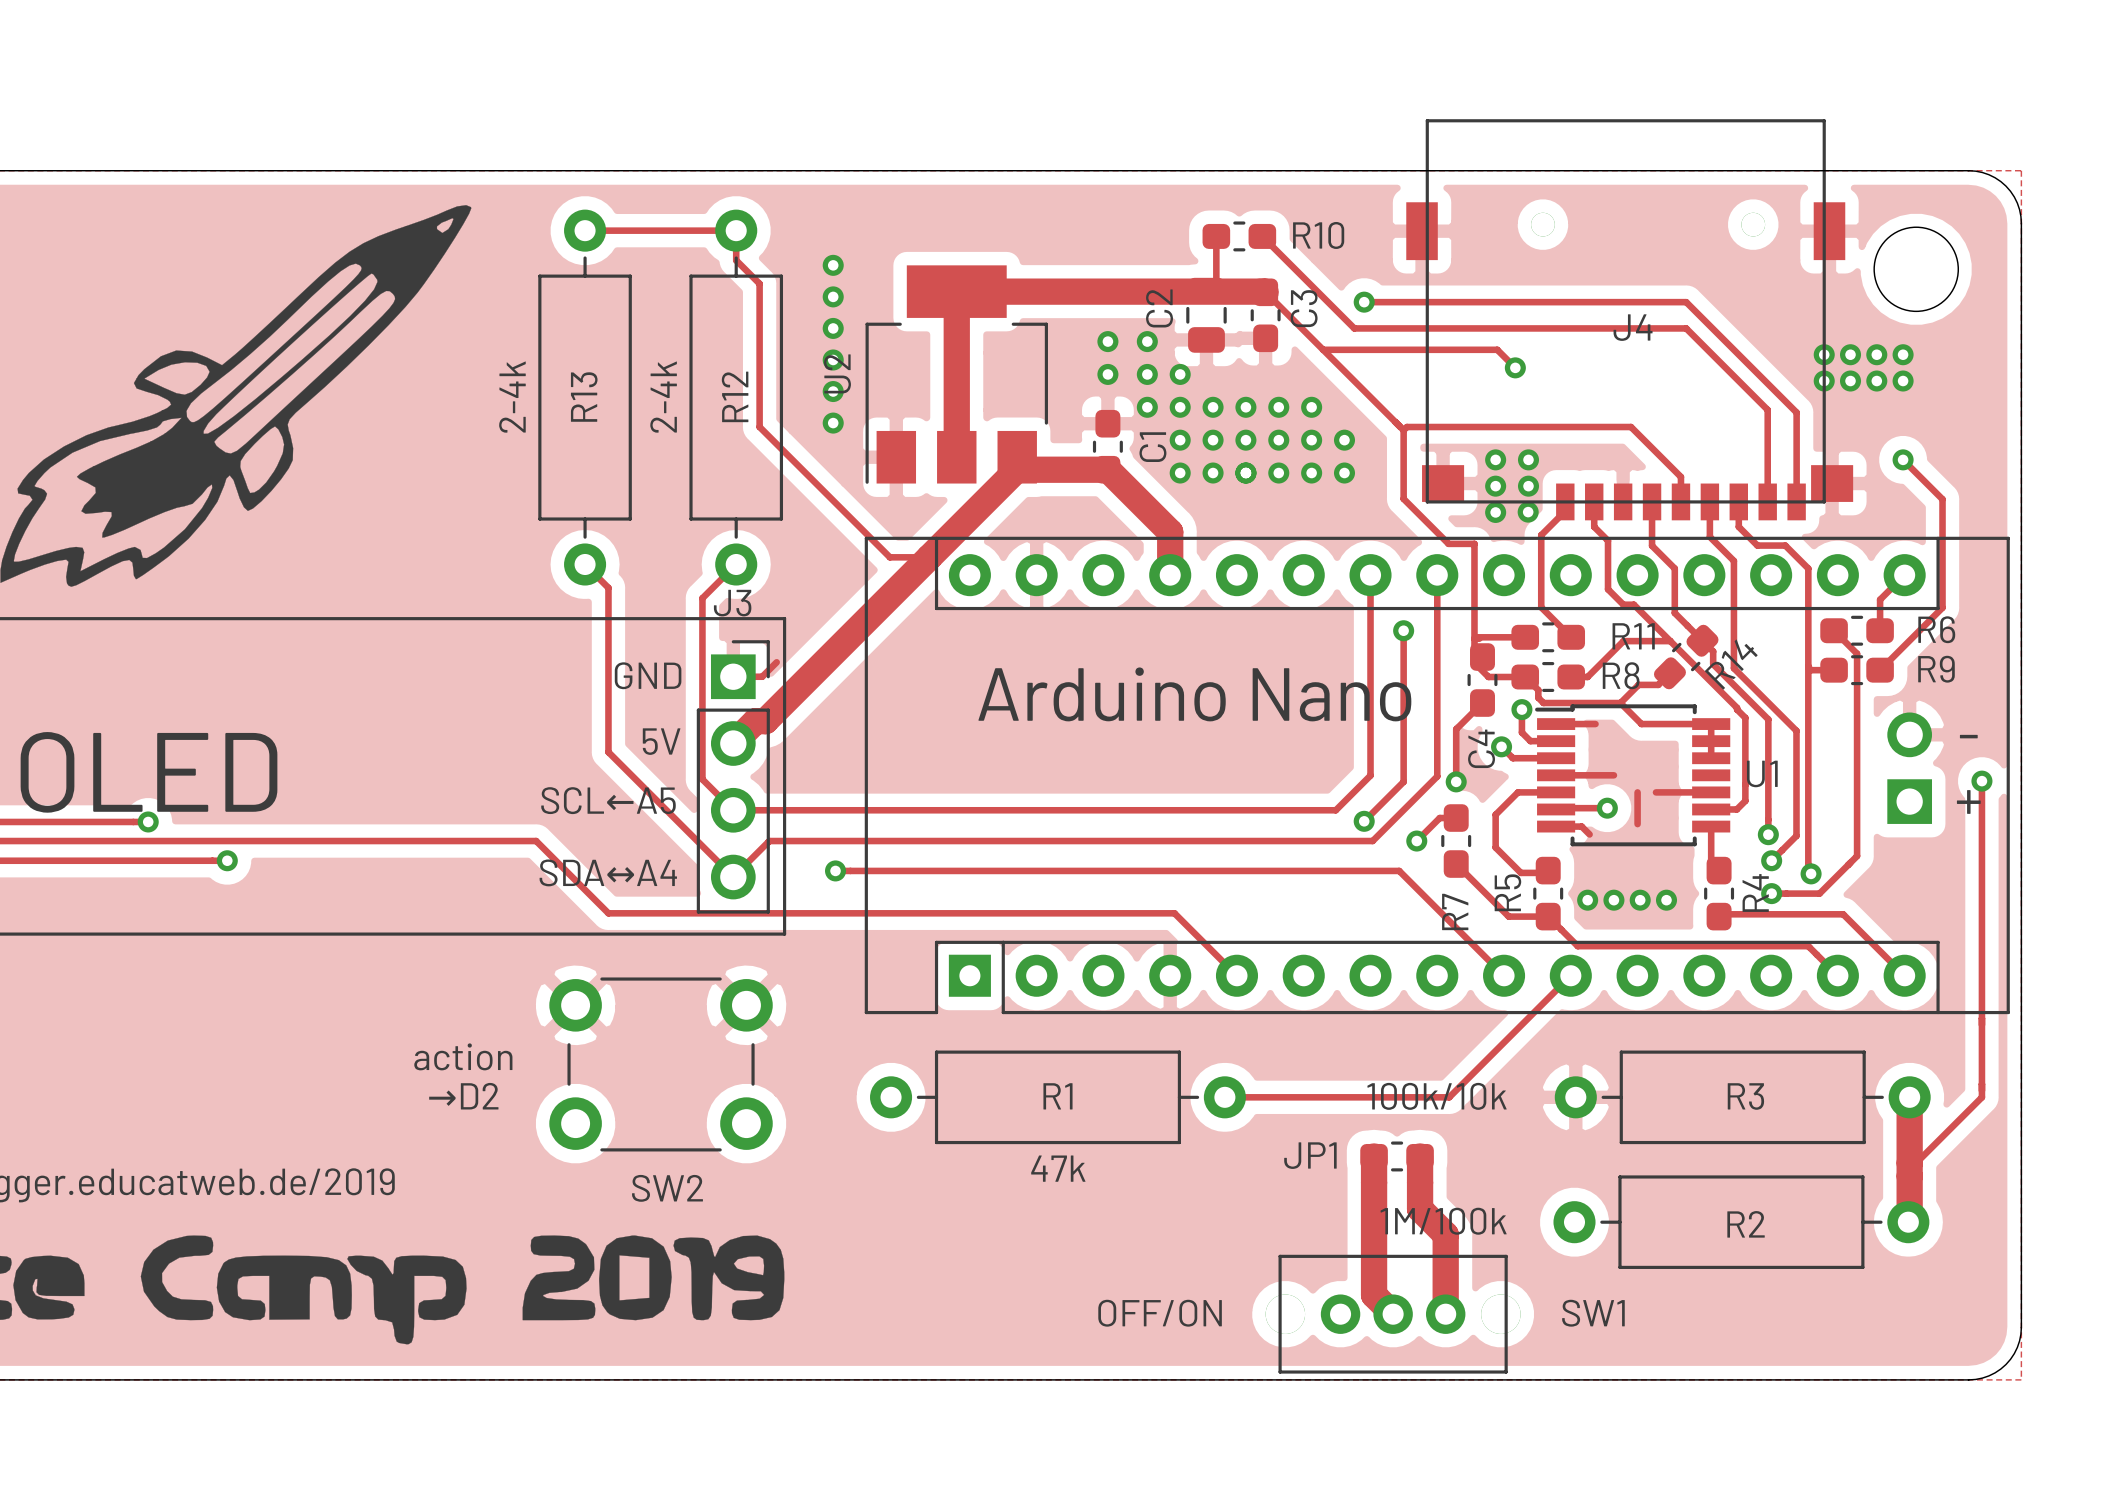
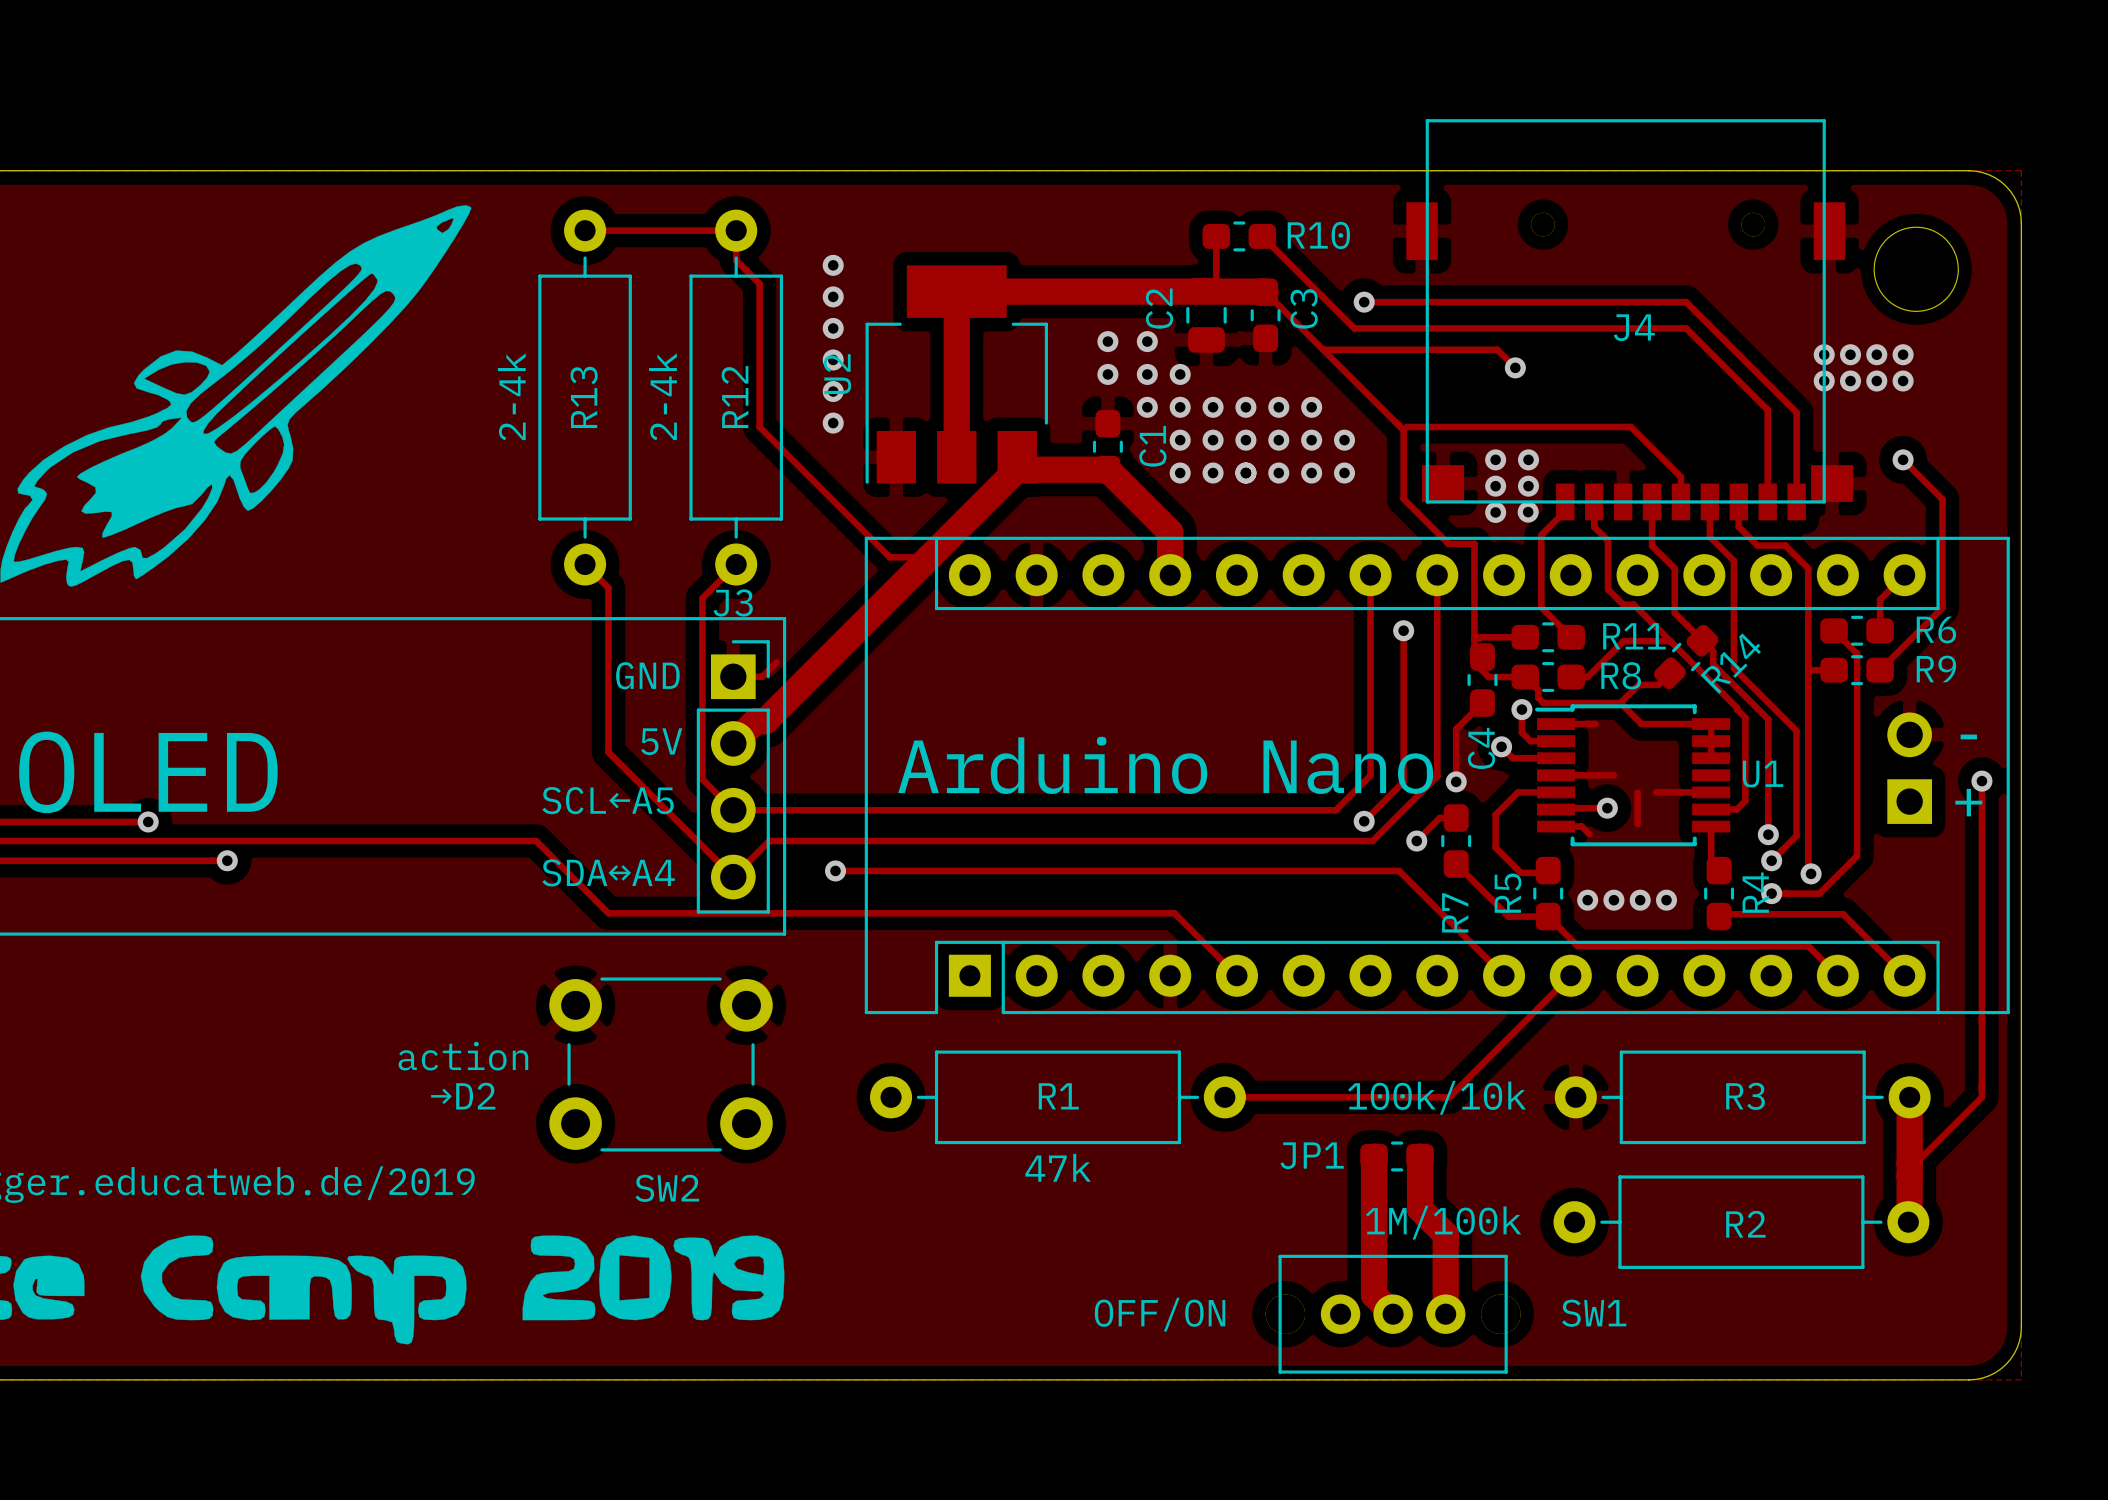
part value position: Arduino Nano (1194, 694) -> Arduino Nano (1165, 765)

